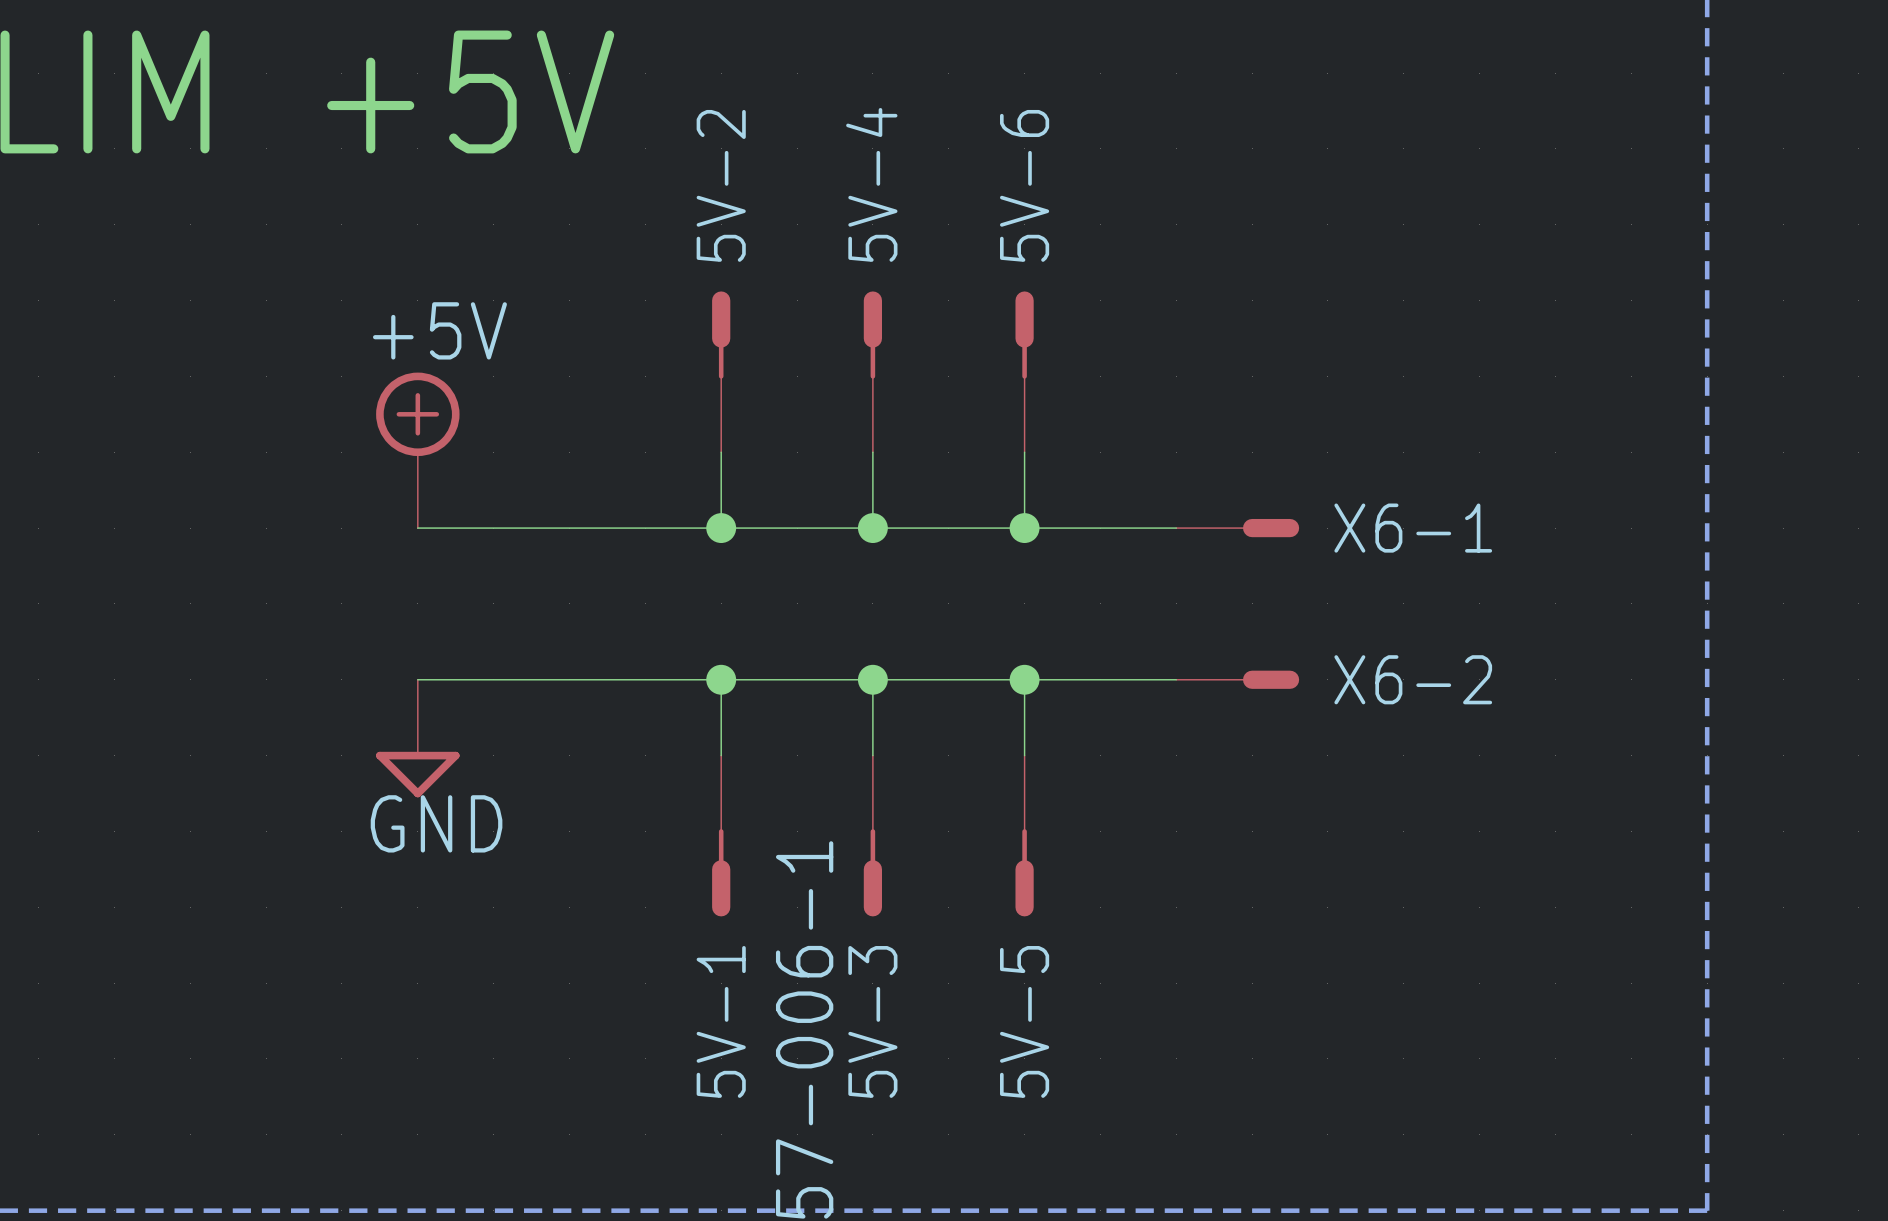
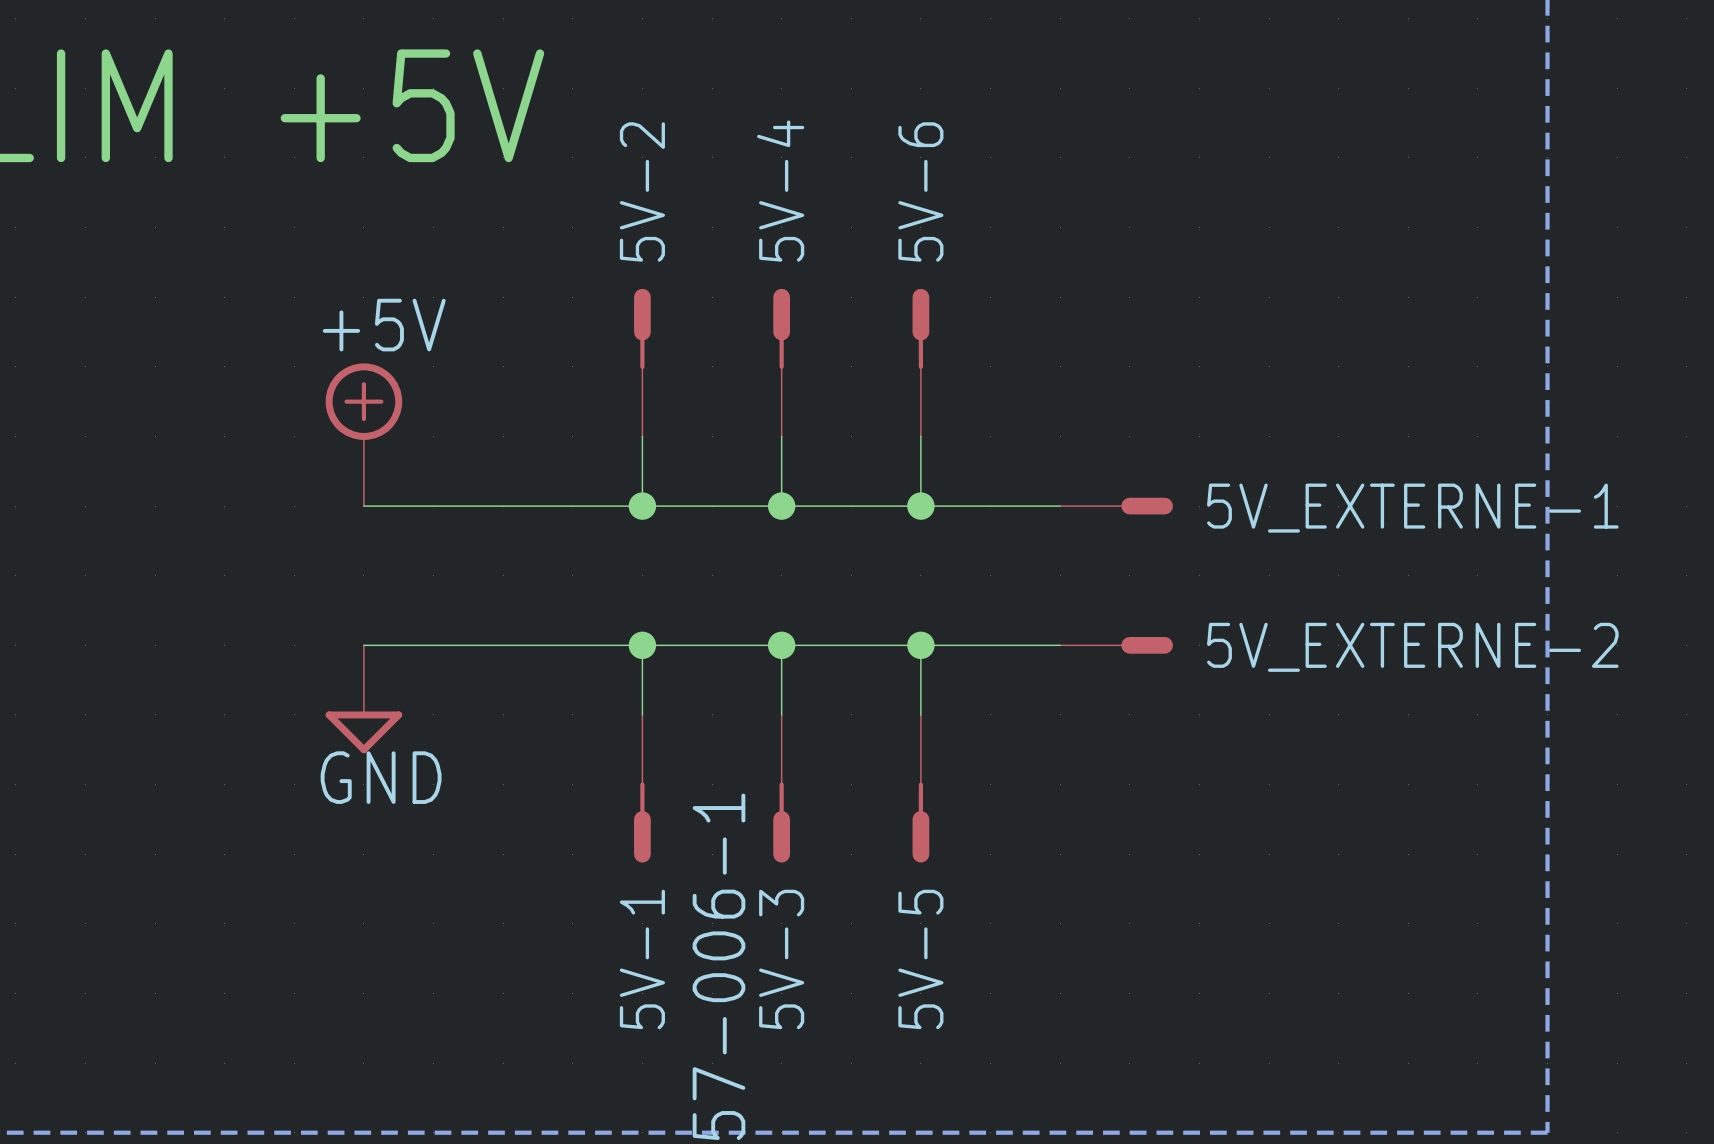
X6-1 name: X6-1 (1413, 528) -> 5V_EXTERNE-1 (1412, 508)
X6-2 name: X6-2 (1413, 679) -> 5V_EXTERNE-2 (1412, 647)

